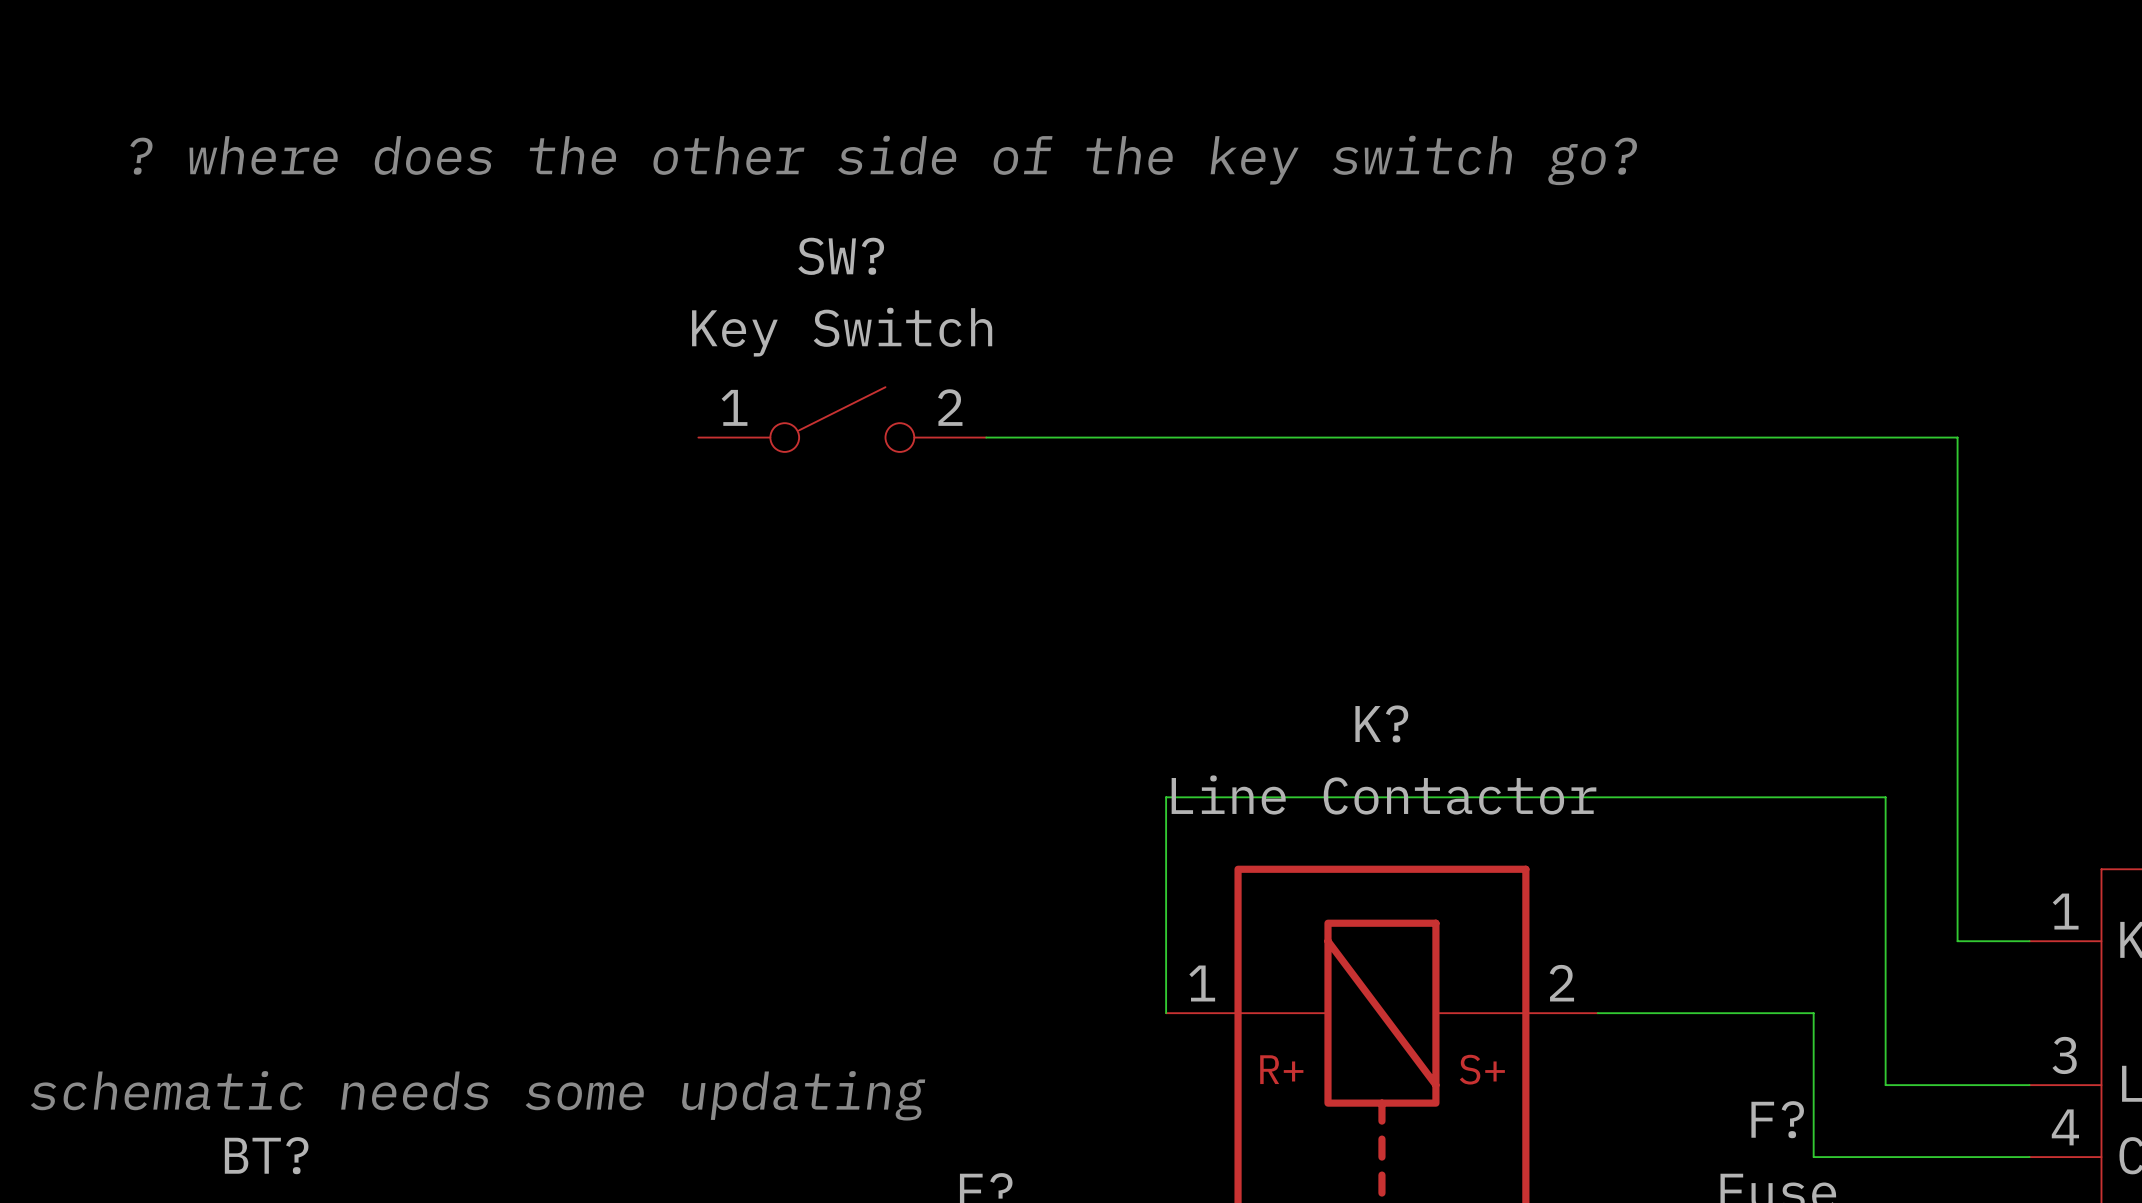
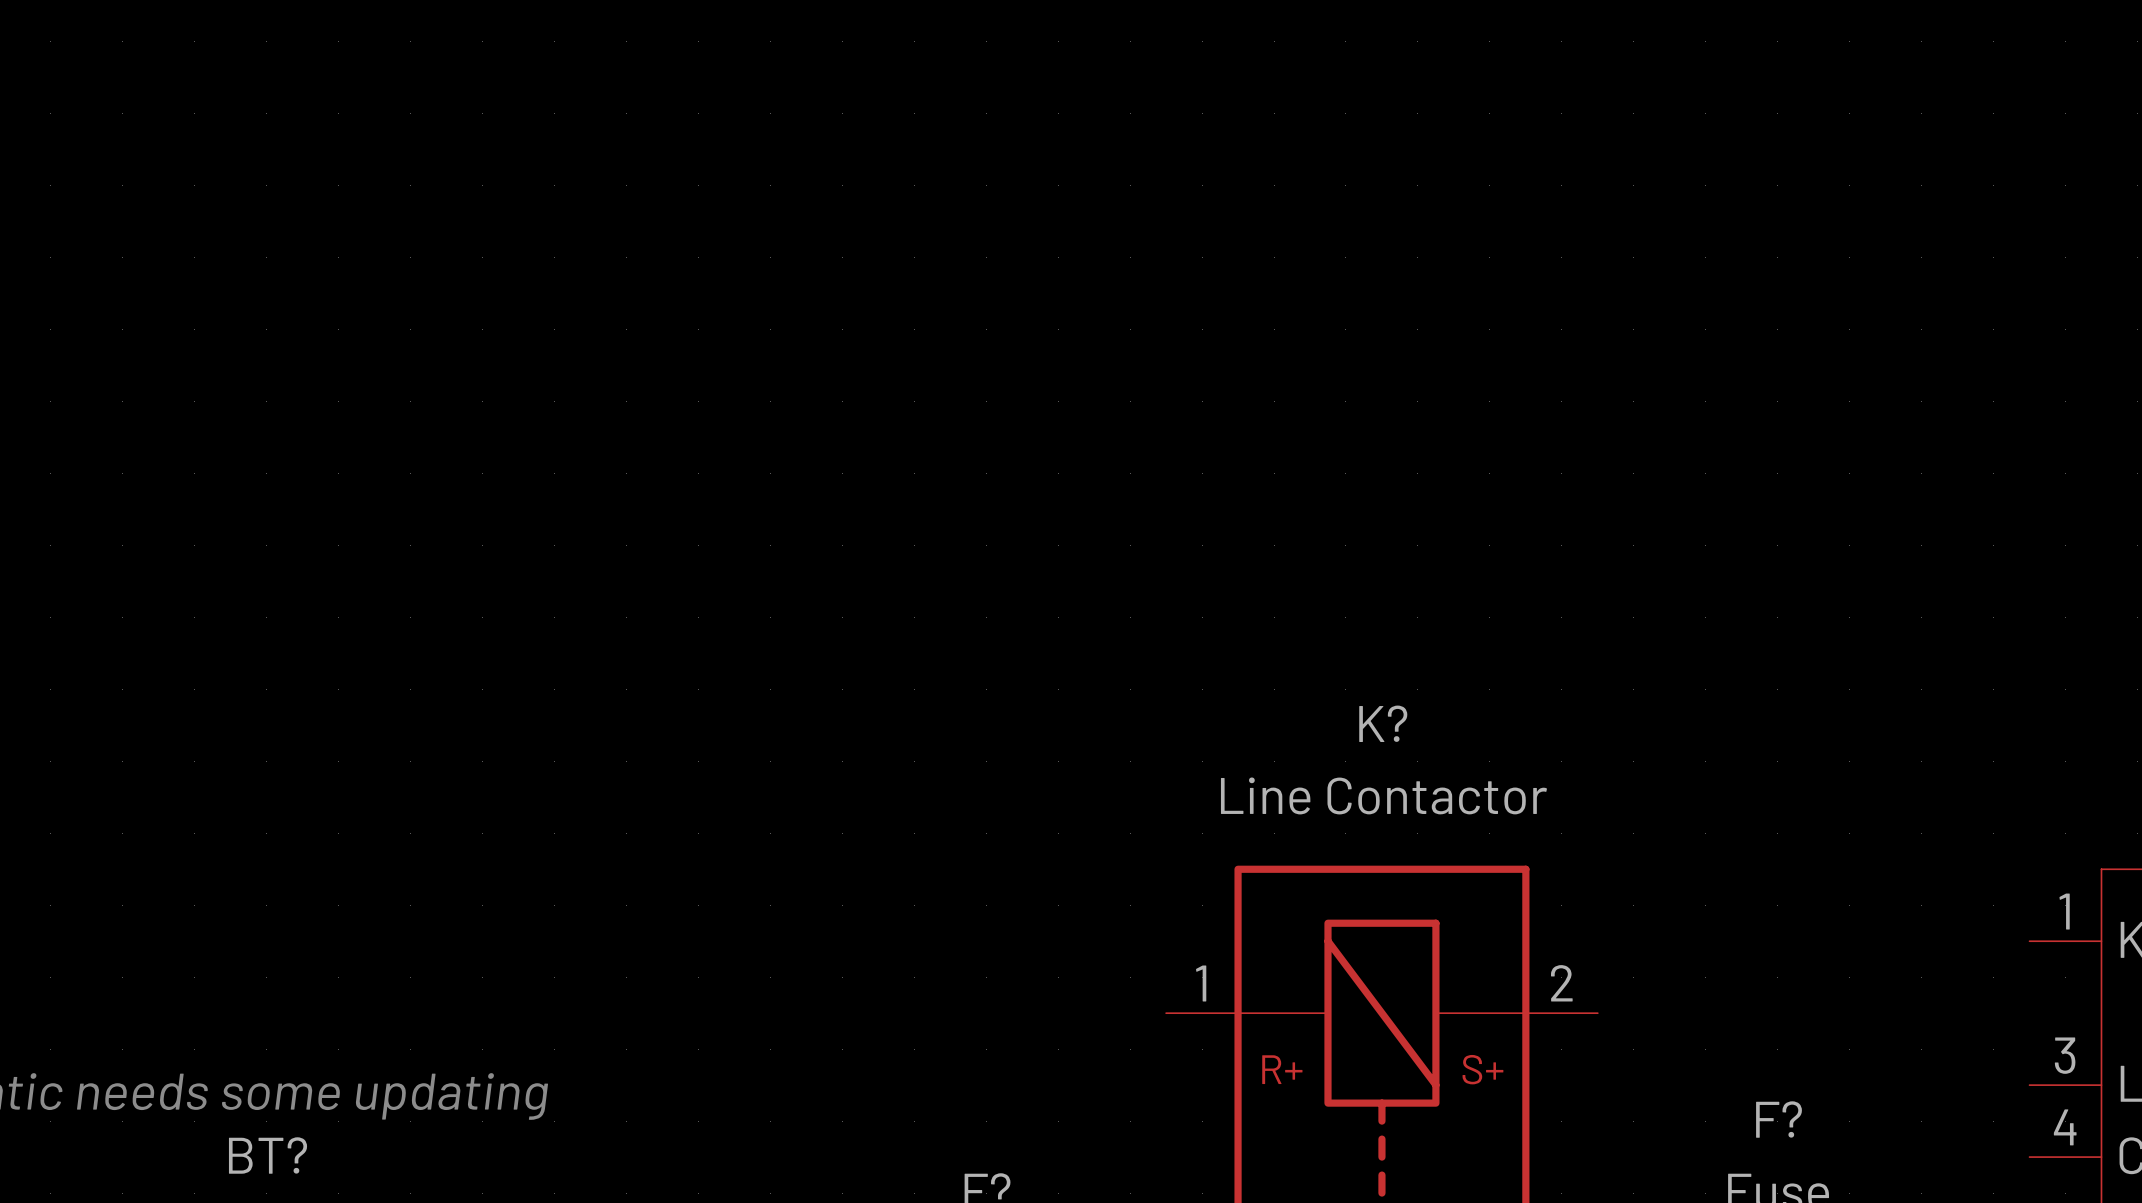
text: ? where does the other side of the key switch go? (883, 160) -> none
SW?: Key Switch (842, 419) -> none
wire: (986, 437) (1957, 437) (1957, 941) (2029, 941) -> none
wire: (1166, 1013) (1166, 797) (1885, 797) (1885, 1085) (2029, 1085) -> none
wire: (1597, 1013) (1813, 1013) (1813, 1157) (2029, 1157) -> none

